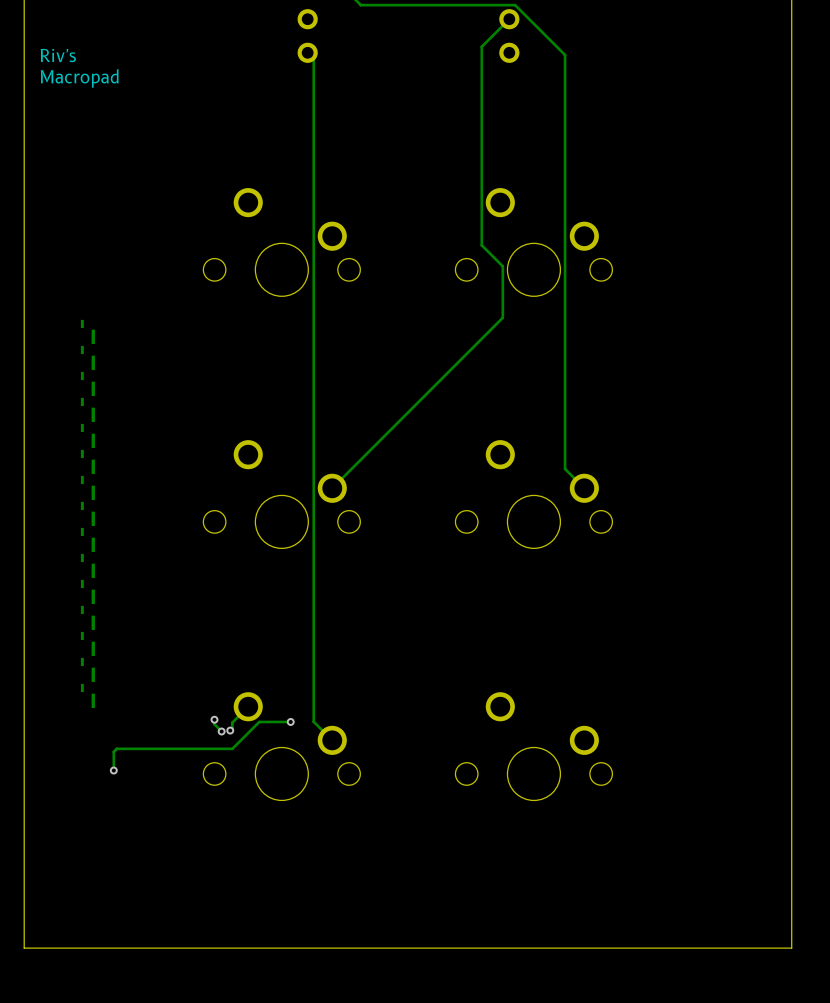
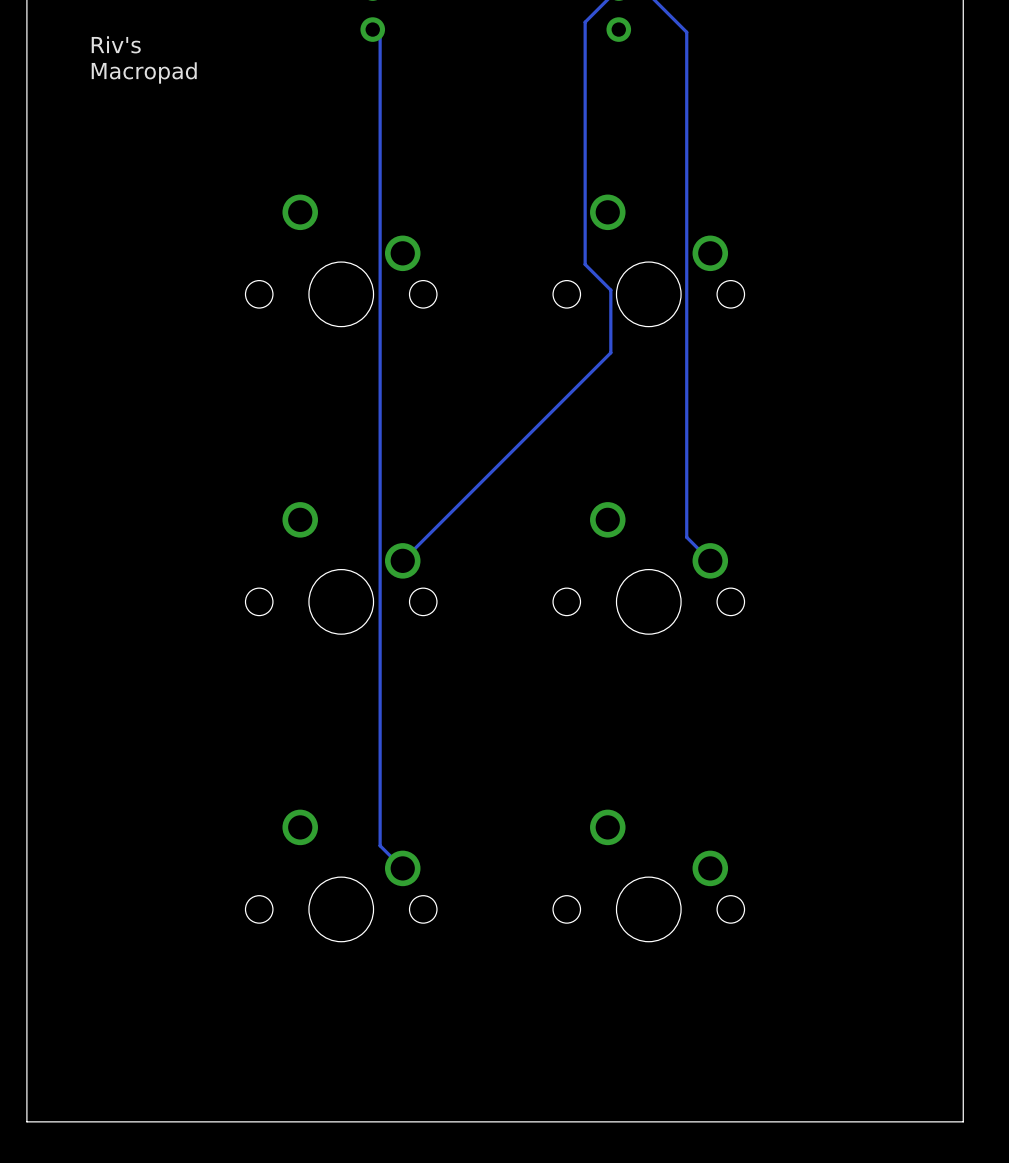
text position: Riv's (58, 55) -> Riv's (116, 44)
text position: Macropad (79, 78) -> Macropad (144, 72)
text: _-_-_-_-_-_-_-_-_-_-_-_-_-_-_- (87, 513) -> none
track: (248, 706) (232, 722) (232, 728) (230, 730) -> none
track: (214, 719) (214, 724) (221, 731) -> none
via: (214, 719) -> none
track: (290, 721) (259, 721) (232, 748) (116, 748) (113, 751) (113, 770) -> none
via: (290, 721) -> none
via: (230, 730) -> none
via: (221, 731) -> none
via: (113, 770) -> none

